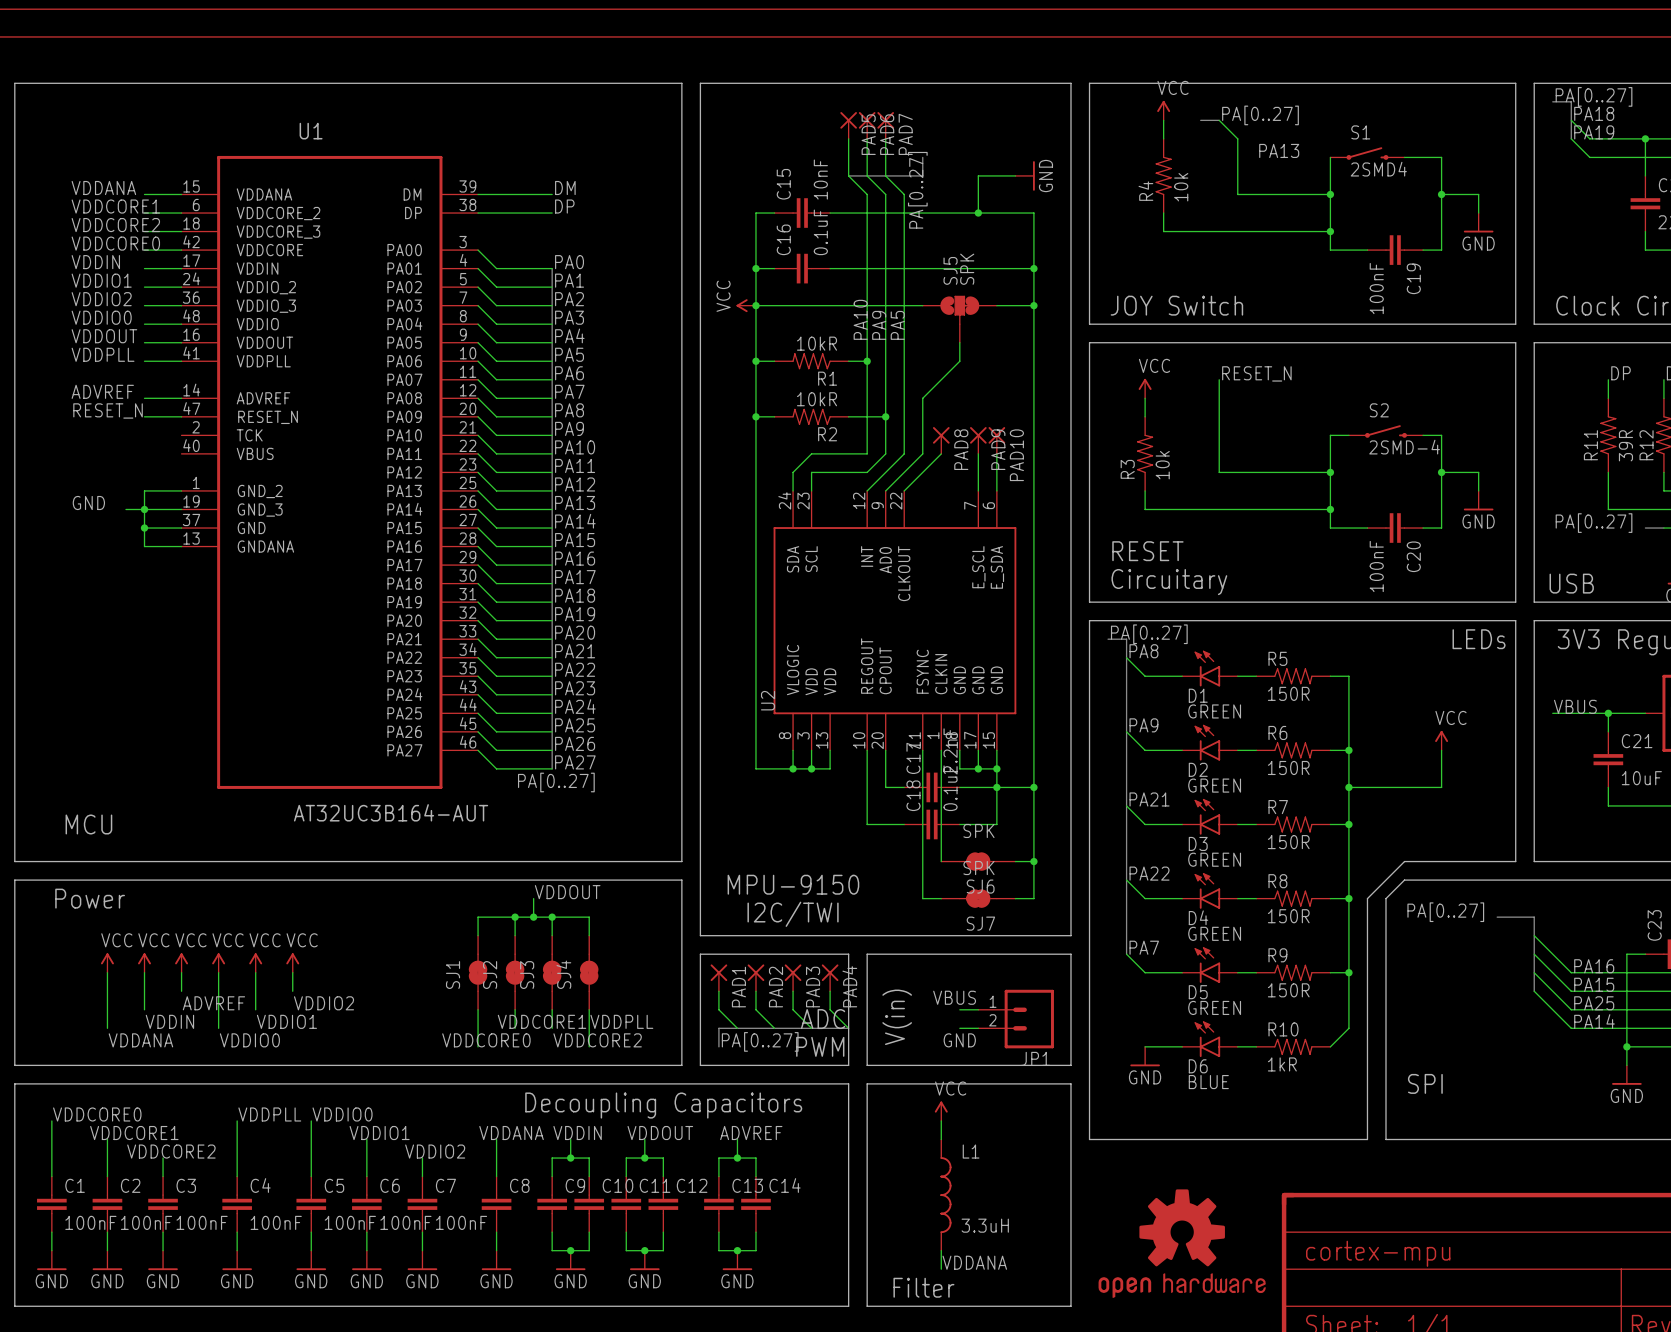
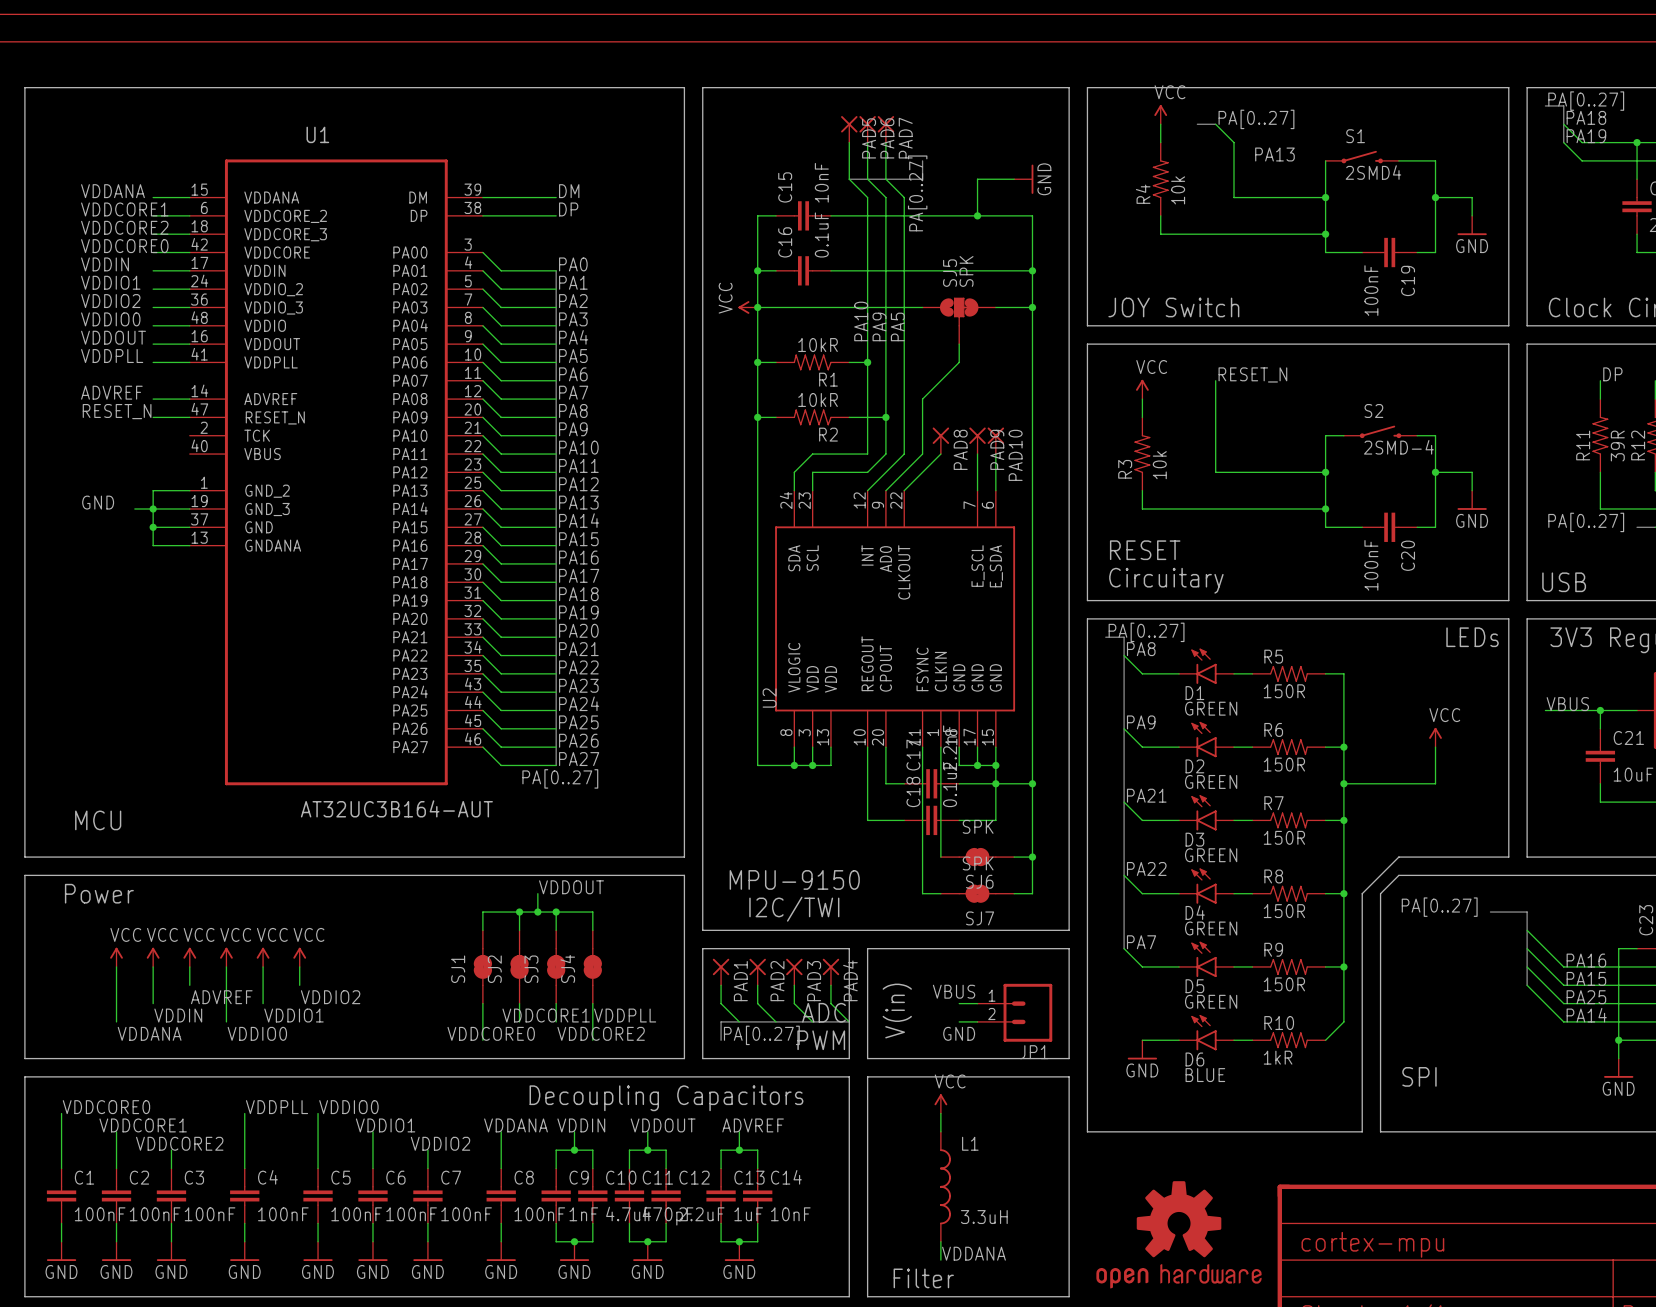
C8 value: none -> 100nF (539, 1214)
C9 value: none -> 1nF (583, 1214)
C10 value: none -> 4.7uF (628, 1213)
C12 value: none -> 2.2uF (701, 1214)
C13 value: none -> 1uF (748, 1214)
C14 value: none -> 10nF (790, 1214)
C11 value: none -> 470pF (668, 1216)

